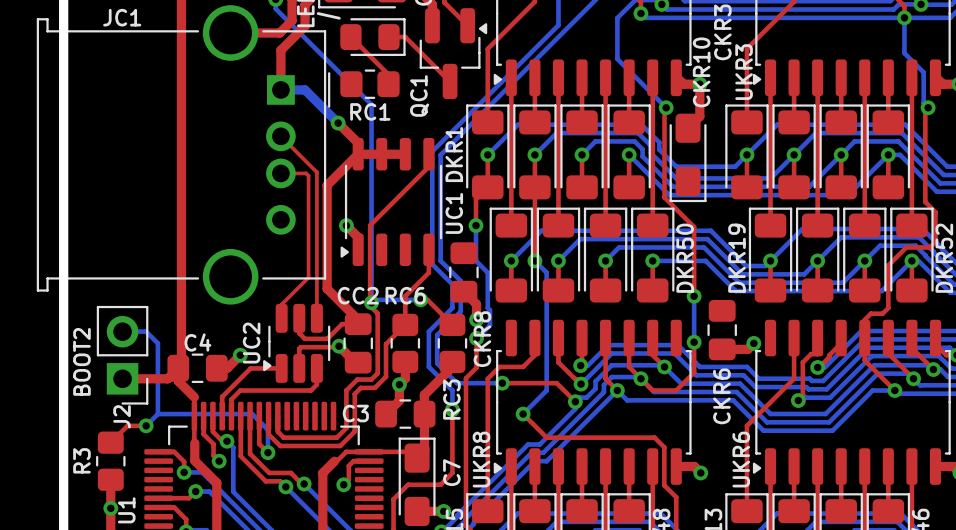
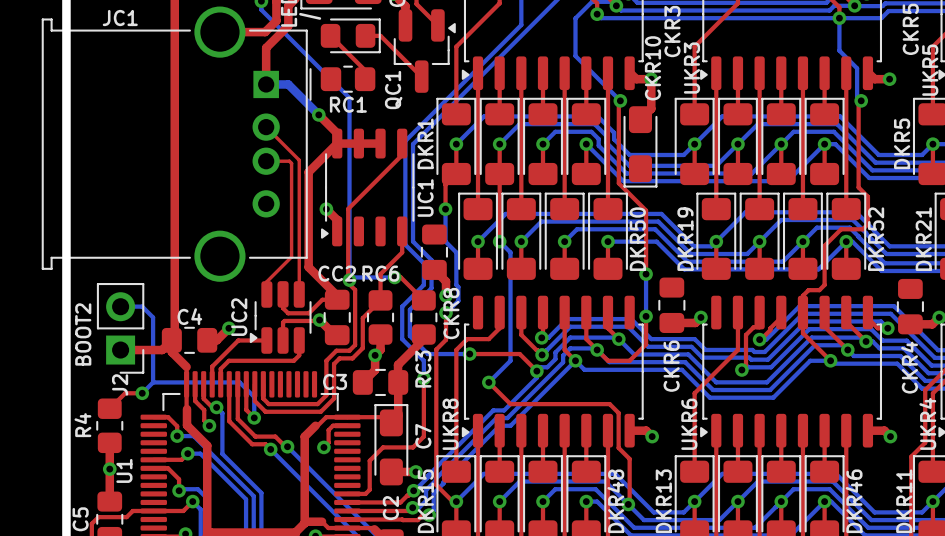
R3 name: R3 (81, 460) -> R4 (82, 425)

